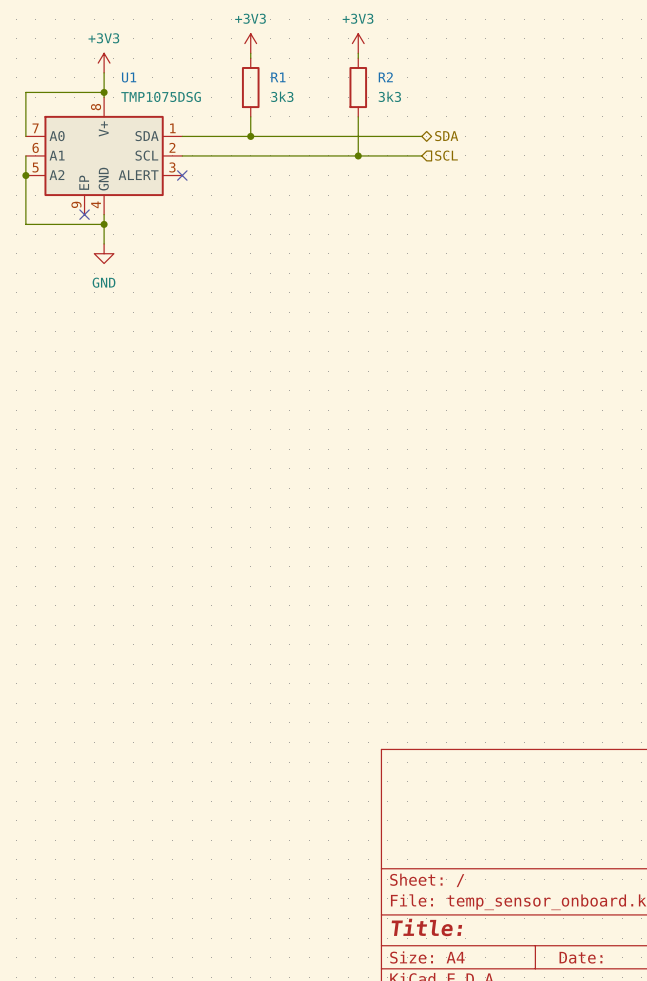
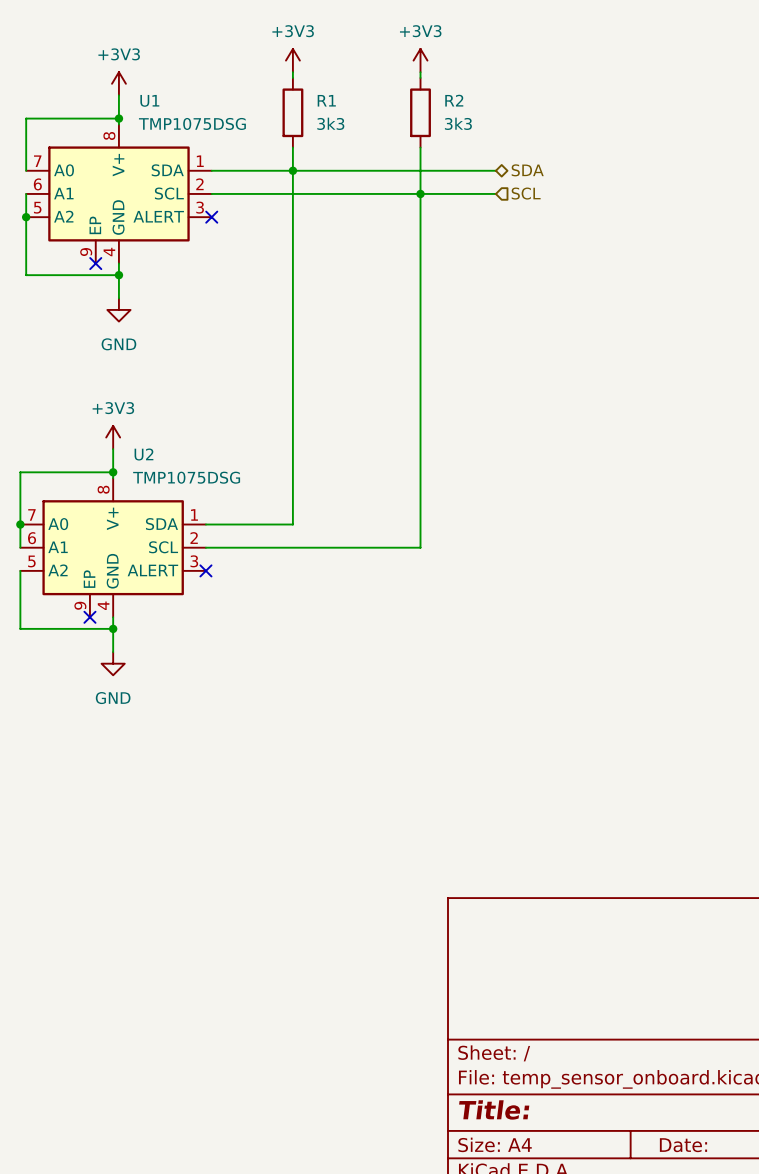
wire: none -> (292, 170) (292, 524) (205, 524)
wire: none -> (420, 193) (420, 547) (205, 547)
power symbol: none -> +3V3 (113, 437)
wire: none -> (113, 449) (113, 478)
wire: none -> (113, 472) (20, 472) (20, 547)
junction: none -> (113, 472)
junction: none -> (20, 524)
U2: none -> TMP1075DSG (113, 547)
wire: none -> (20, 570) (20, 628) (113, 628)
no-connect mark: none -> (205, 570)
no-connect mark: none -> (89, 617)
wire: none -> (113, 617) (113, 652)
junction: none -> (113, 628)
power symbol: none -> GND (113, 663)

